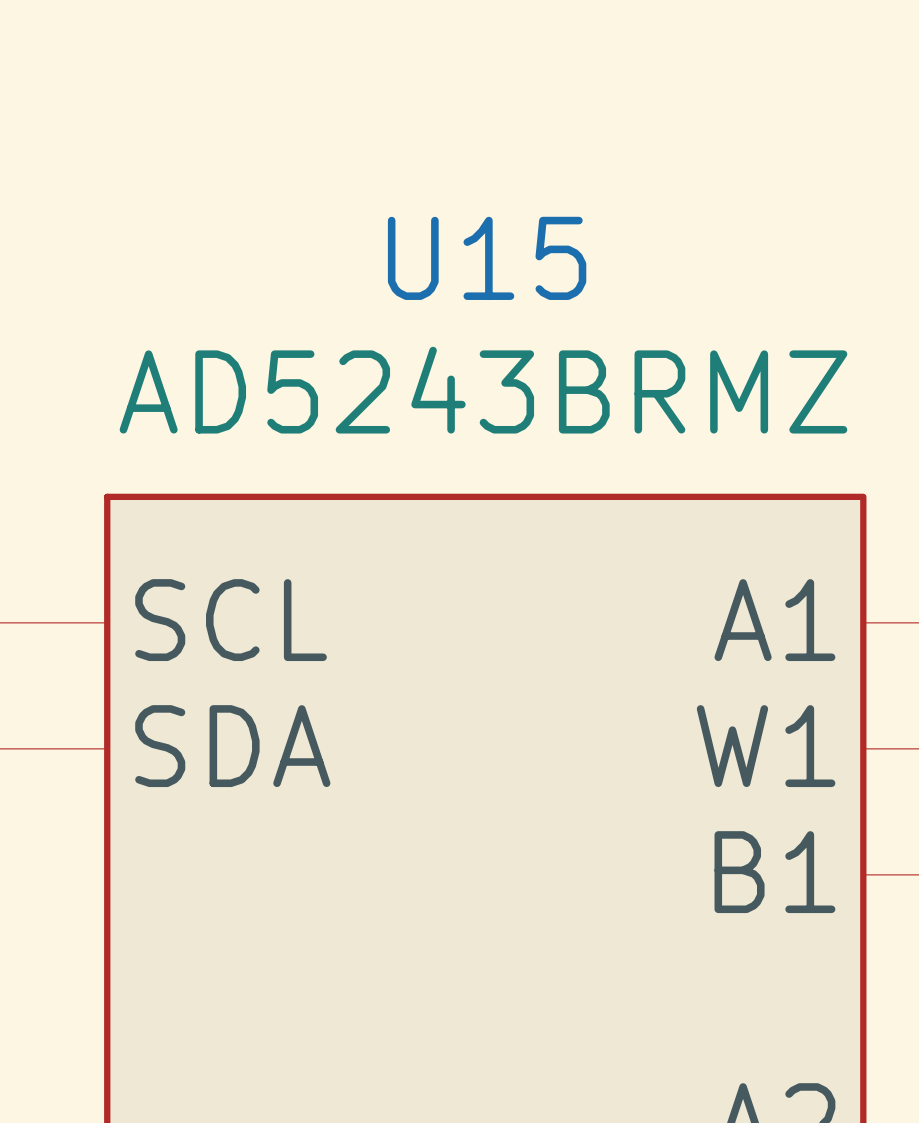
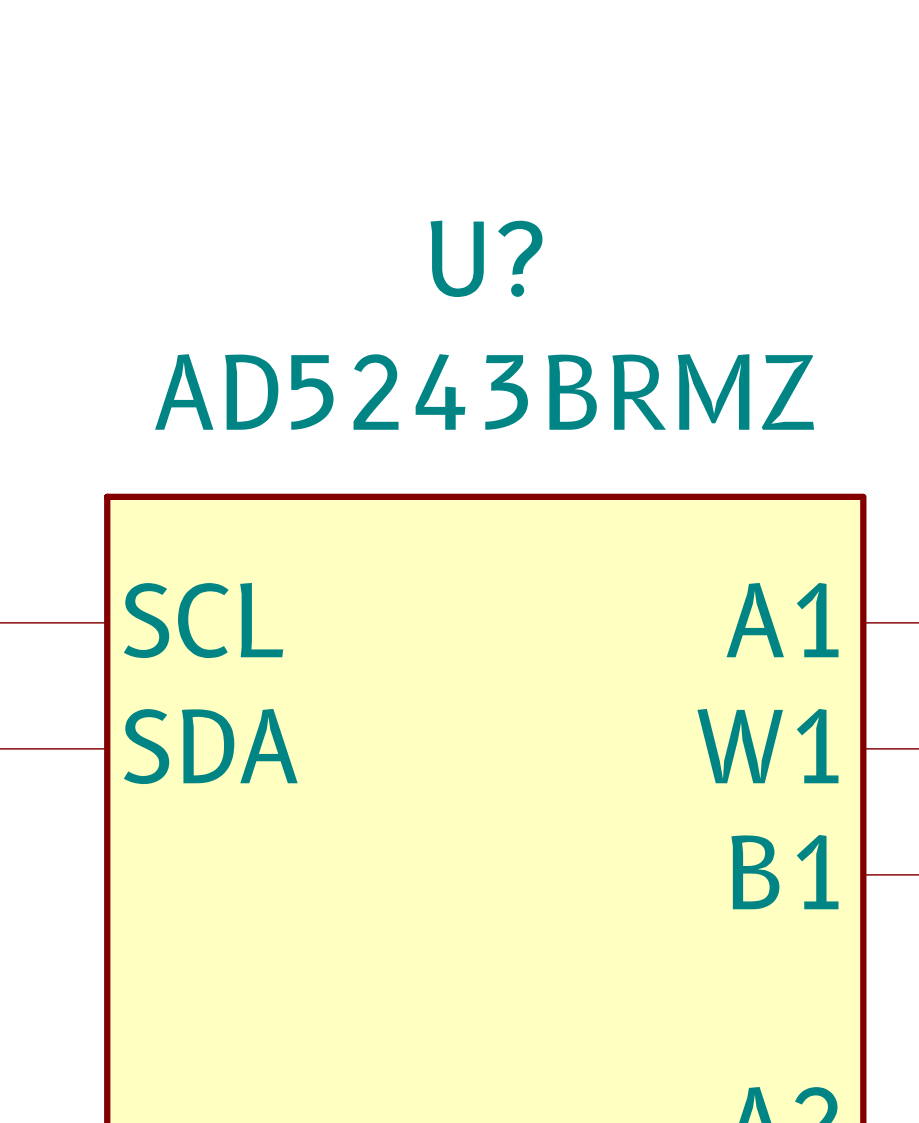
U15 name: U15 (487, 258) -> U? (486, 258)

